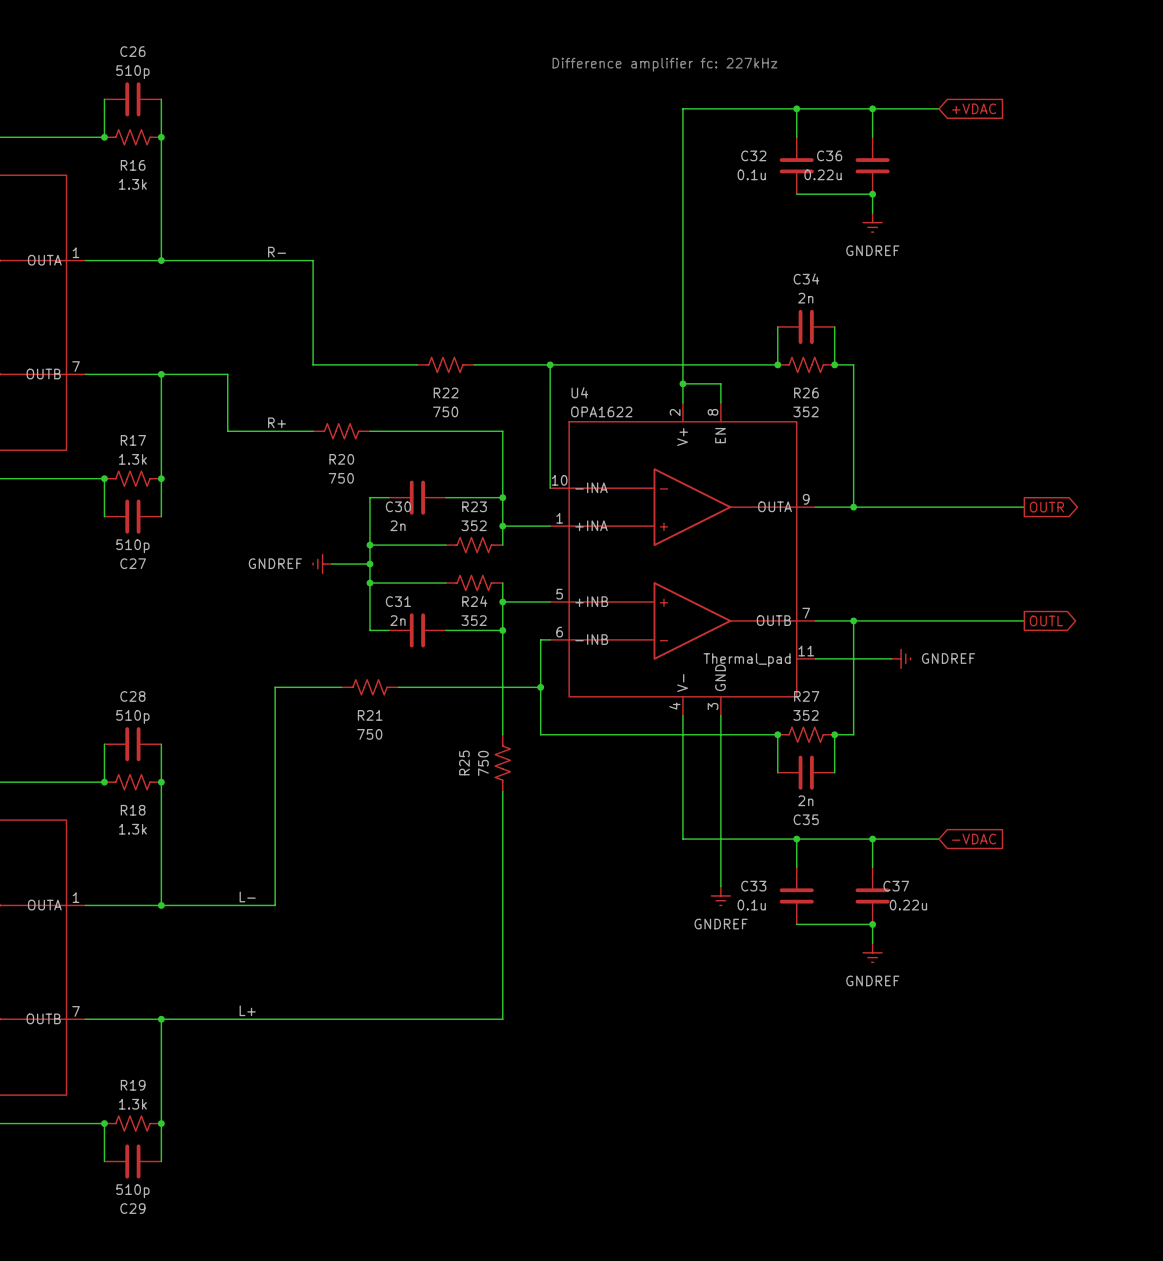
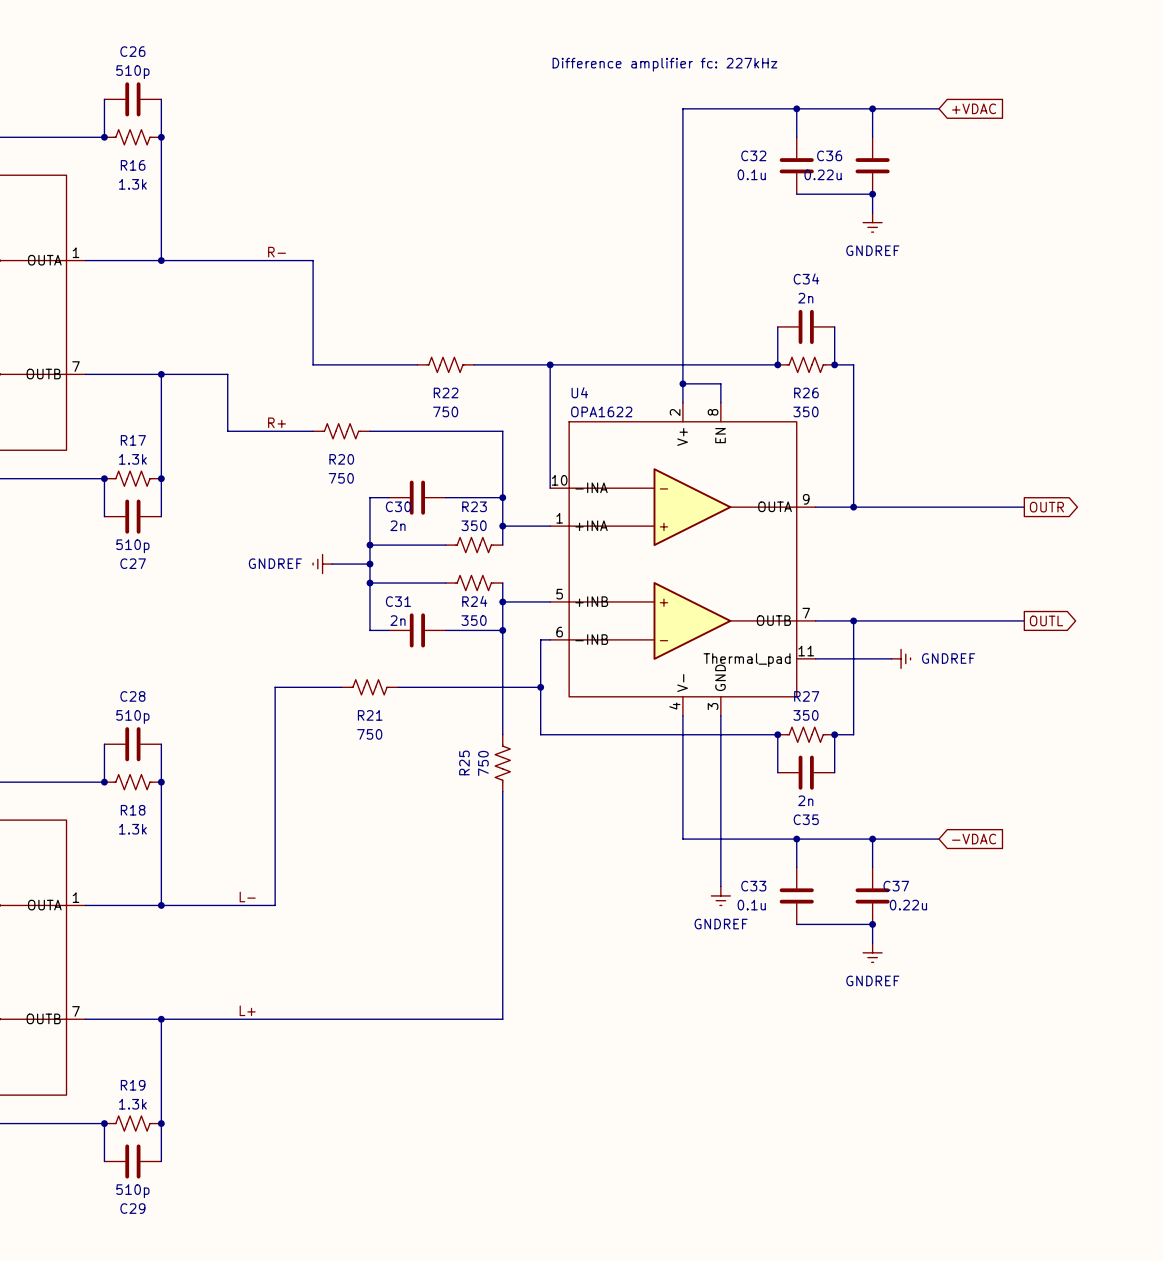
R26 value: 352 (805, 411) -> 350 (805, 411)
R23 value: 352 (474, 525) -> 350 (474, 525)
R24 value: 352 (474, 620) -> 350 (474, 620)
R27 value: 352 (805, 715) -> 350 (805, 715)

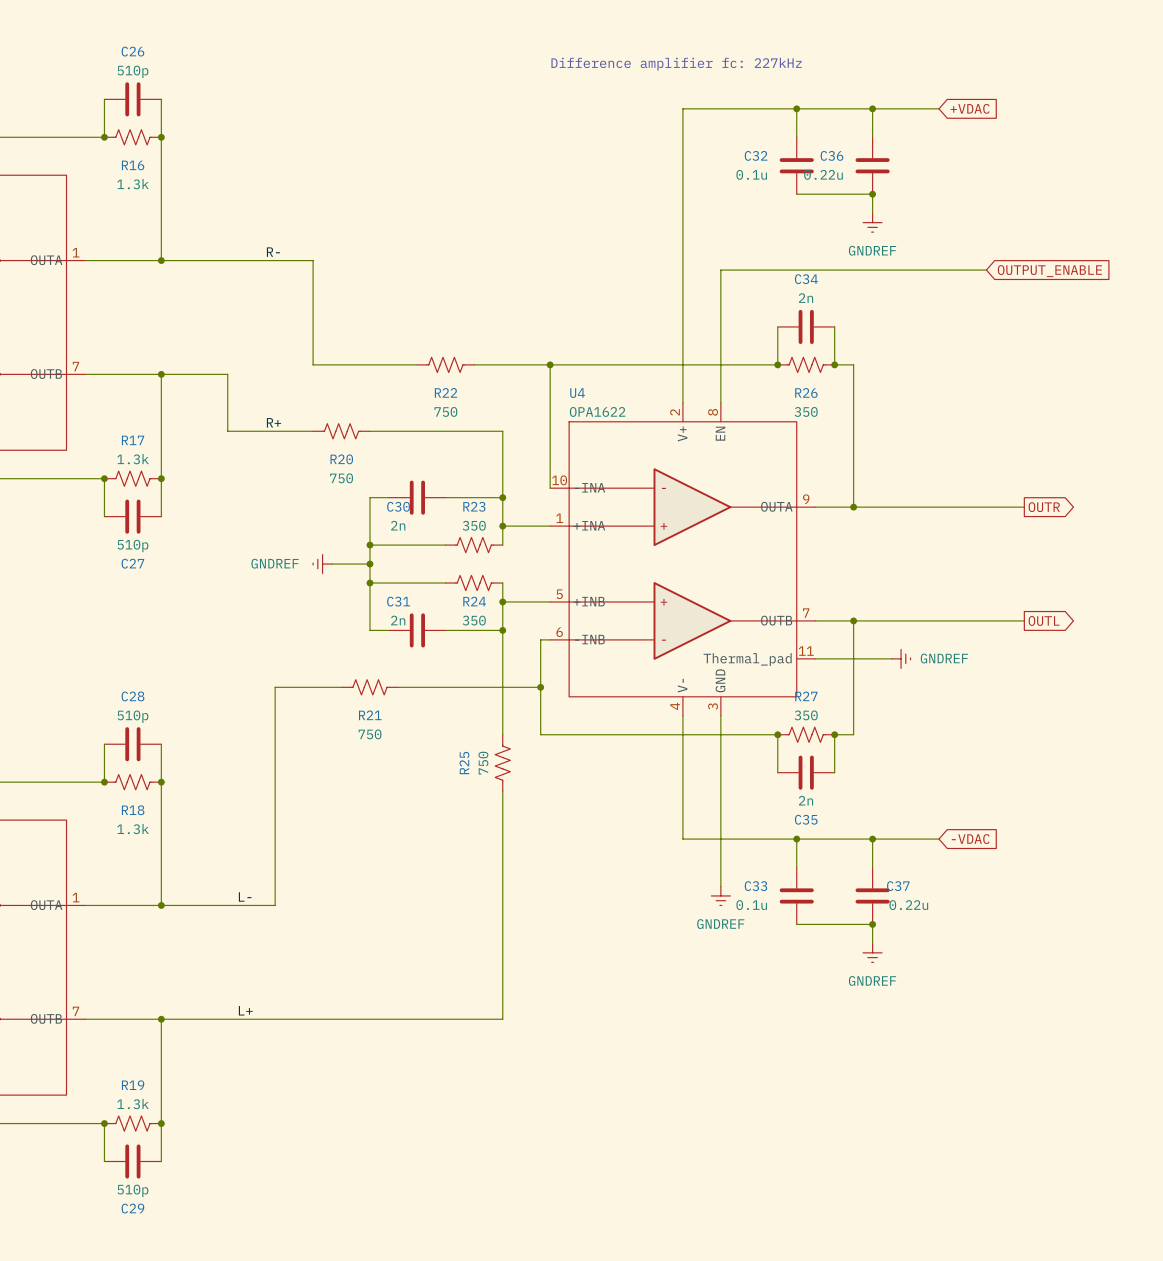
global label: none -> OUTPUT_ENABLE (1049, 271)
wire: (682, 383) (720, 383) -> (986, 270) (720, 270) (720, 383)
junction: (682, 383) -> none

